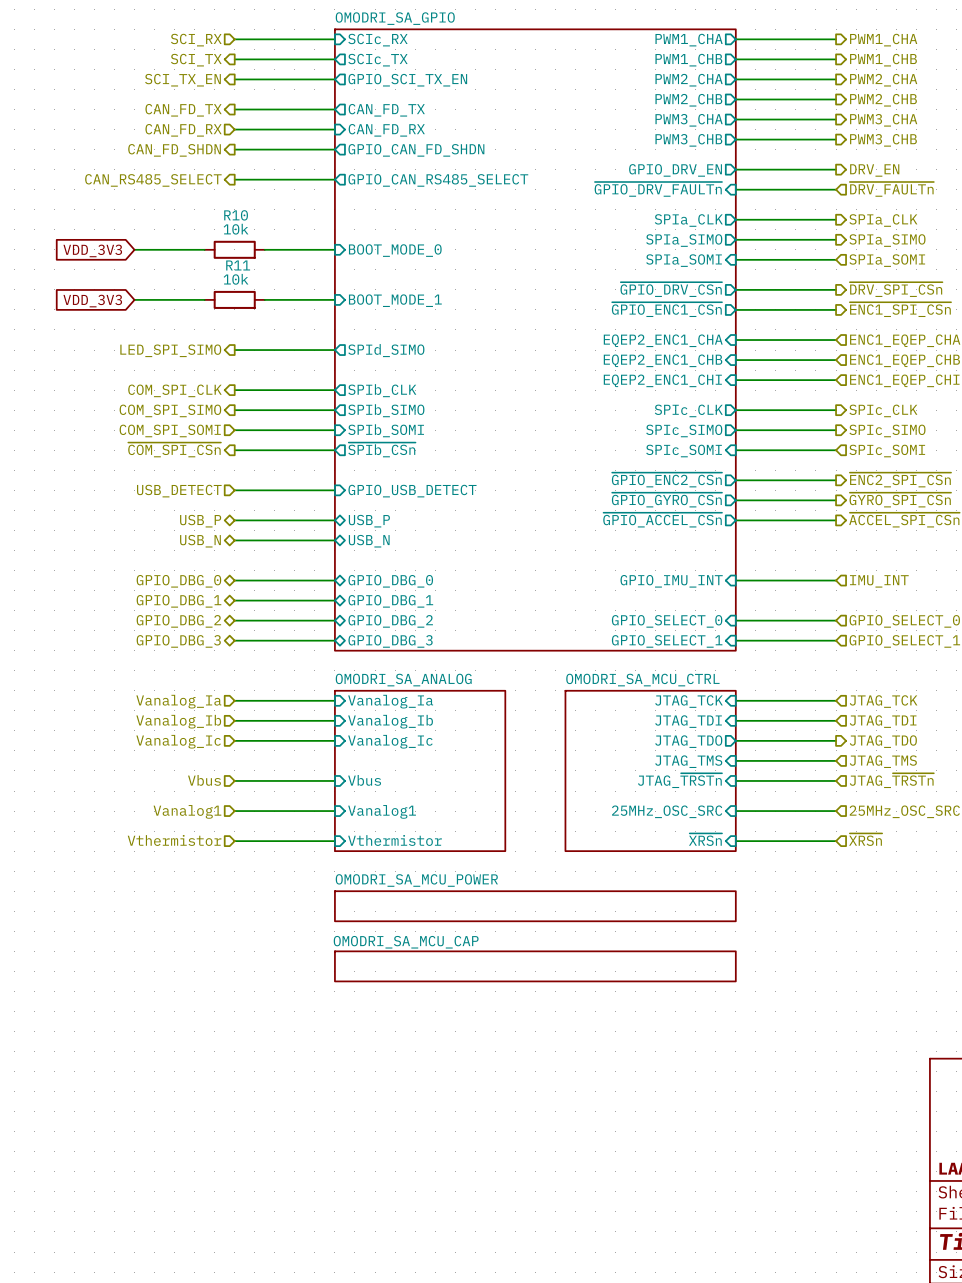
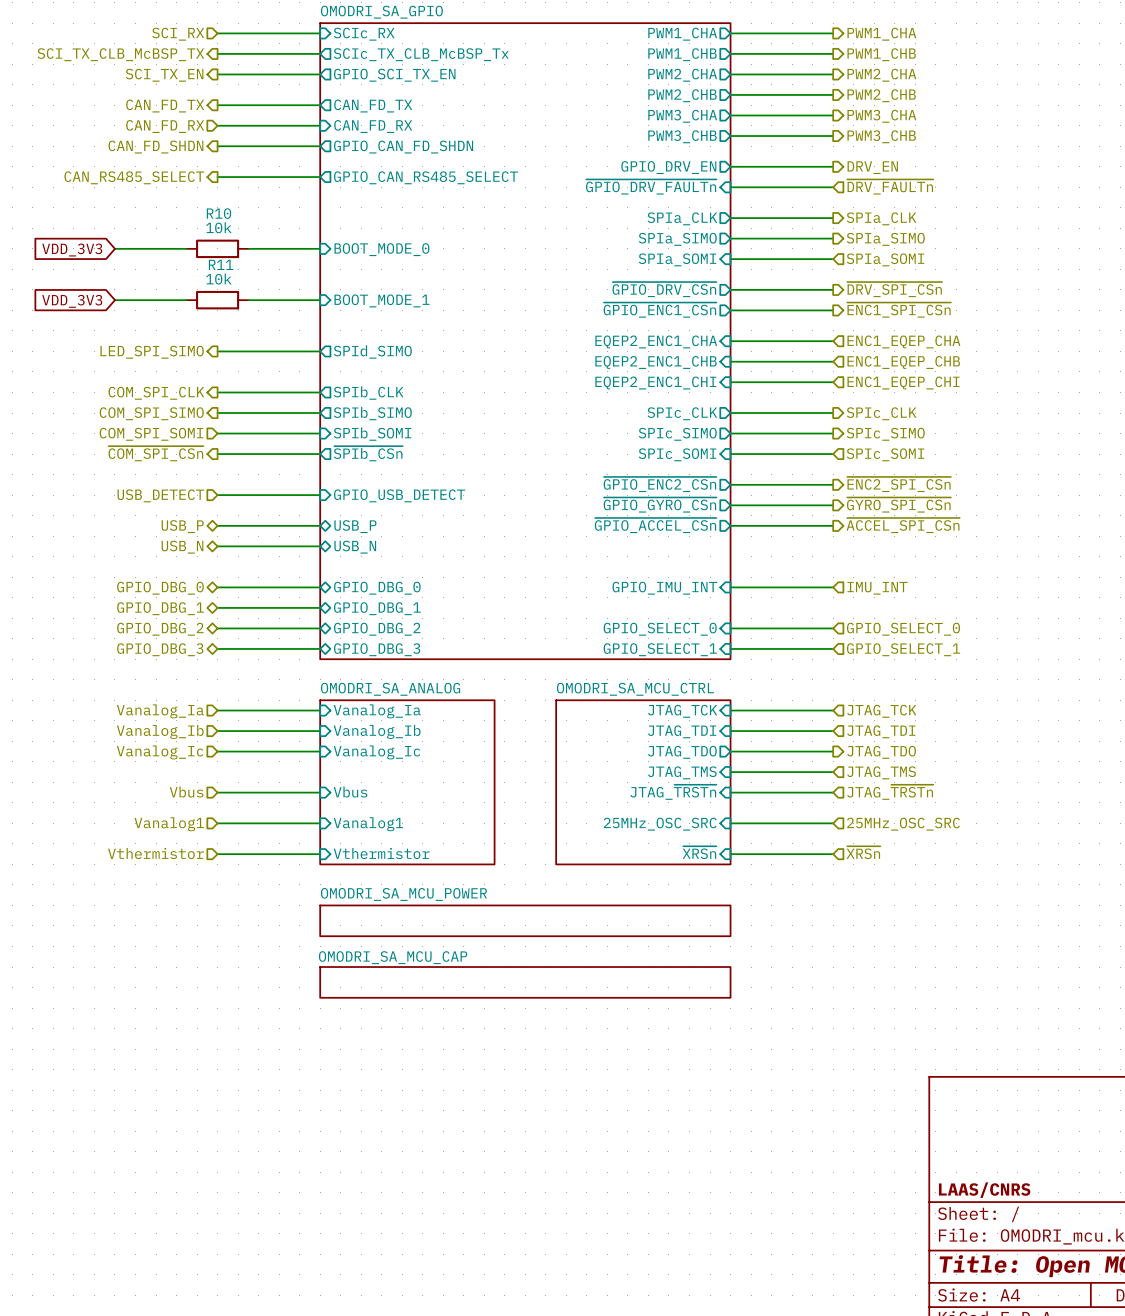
hierarchical label: SCI_TX (196, 60) -> SCI_TX_CLB_McBSP_TX (120, 54)
sheet pin: SCIc_TX (377, 60) -> SCIc_TX_CLB_McBSP_Tx (421, 54)

